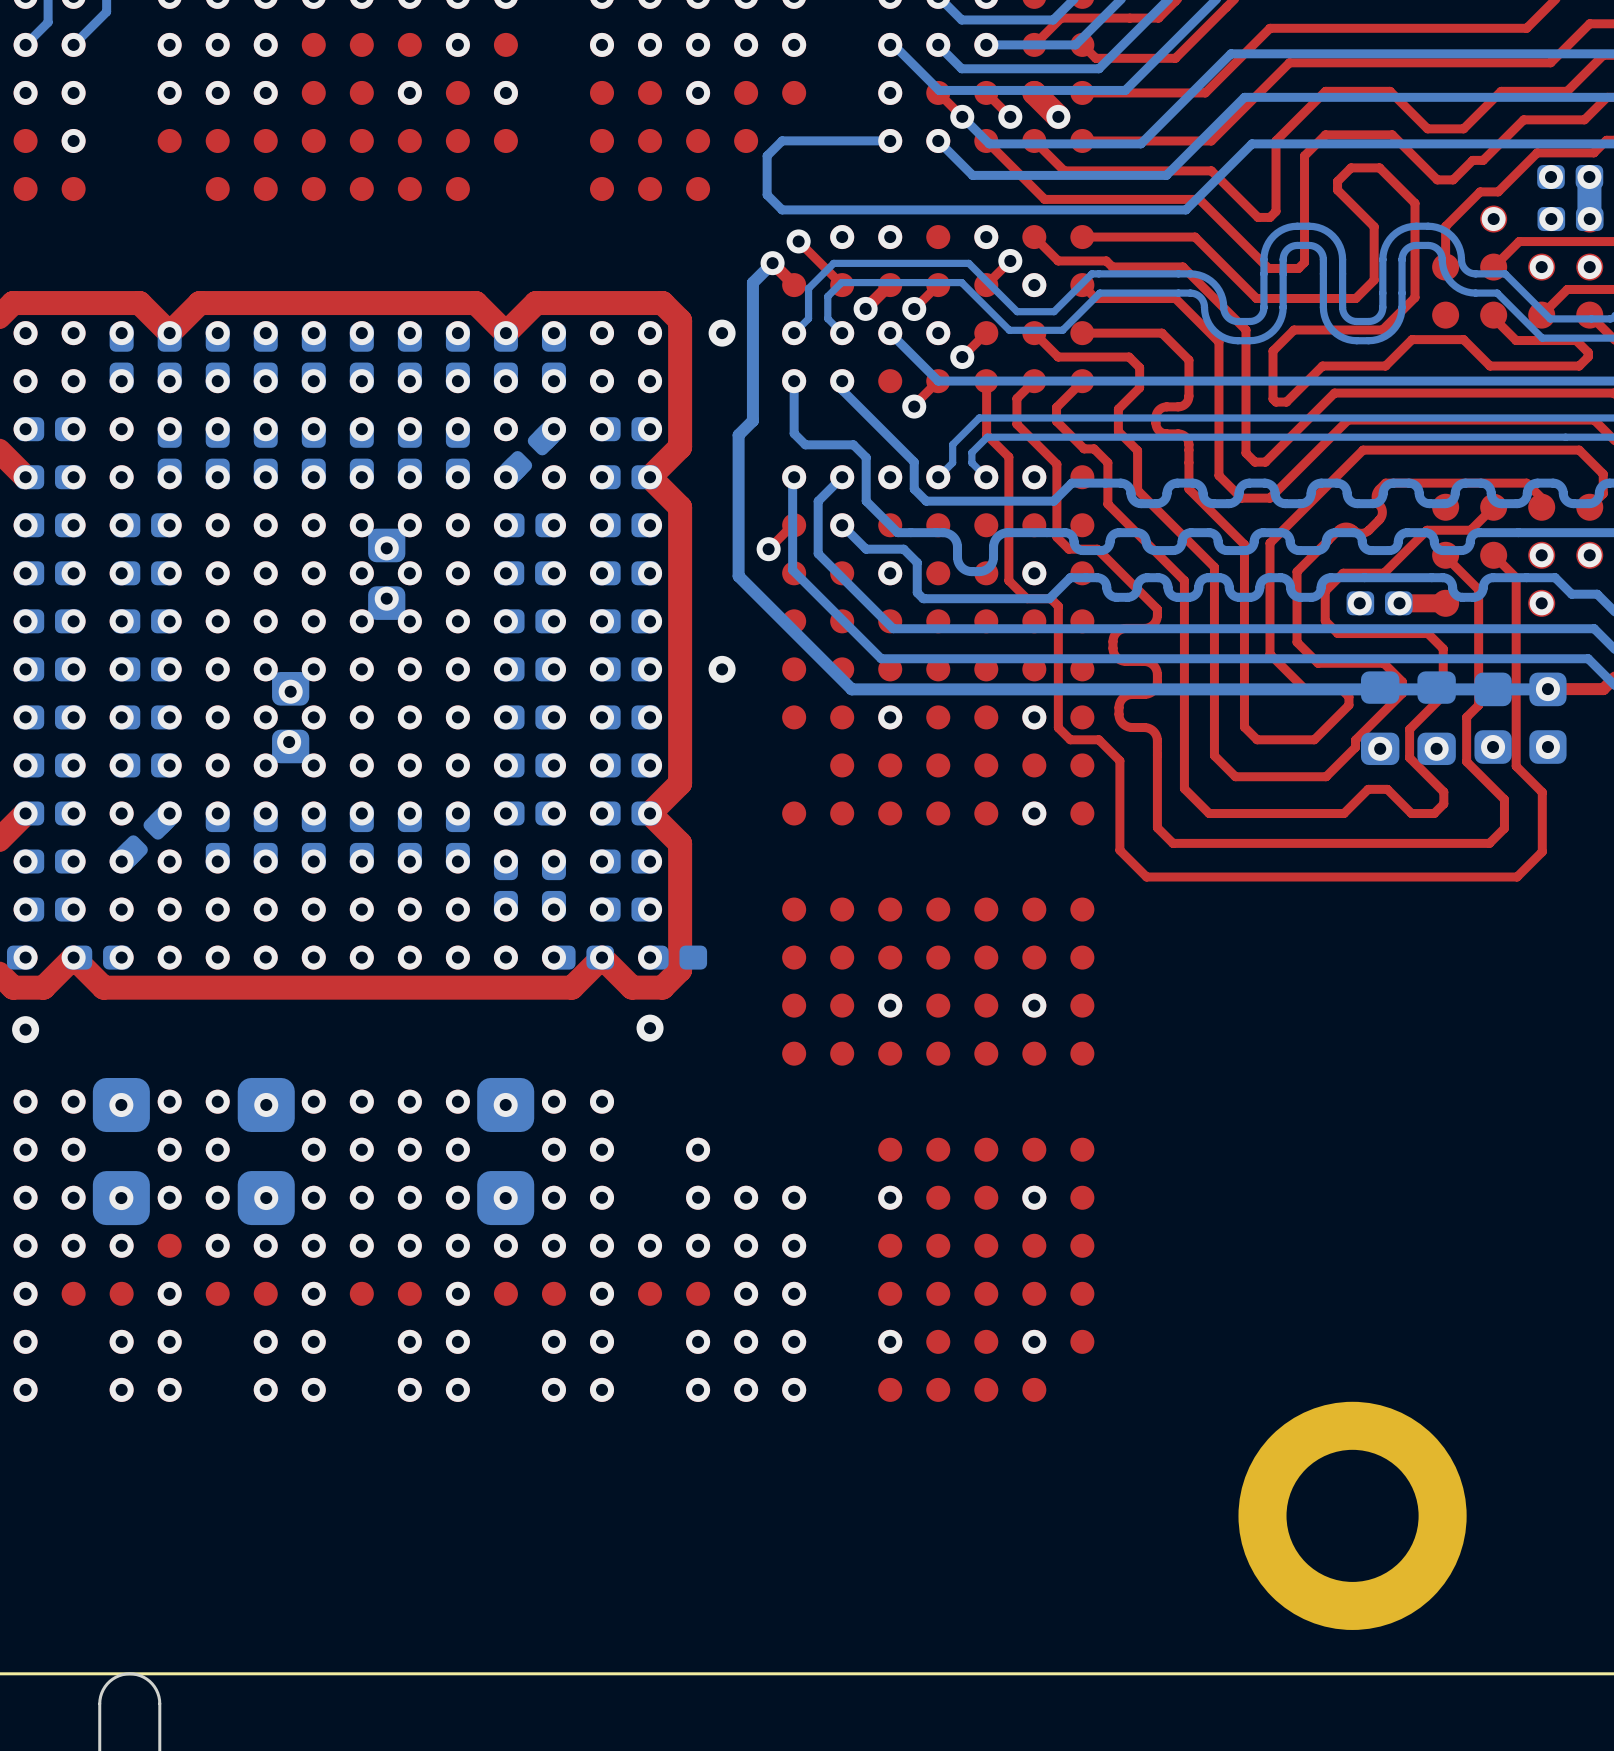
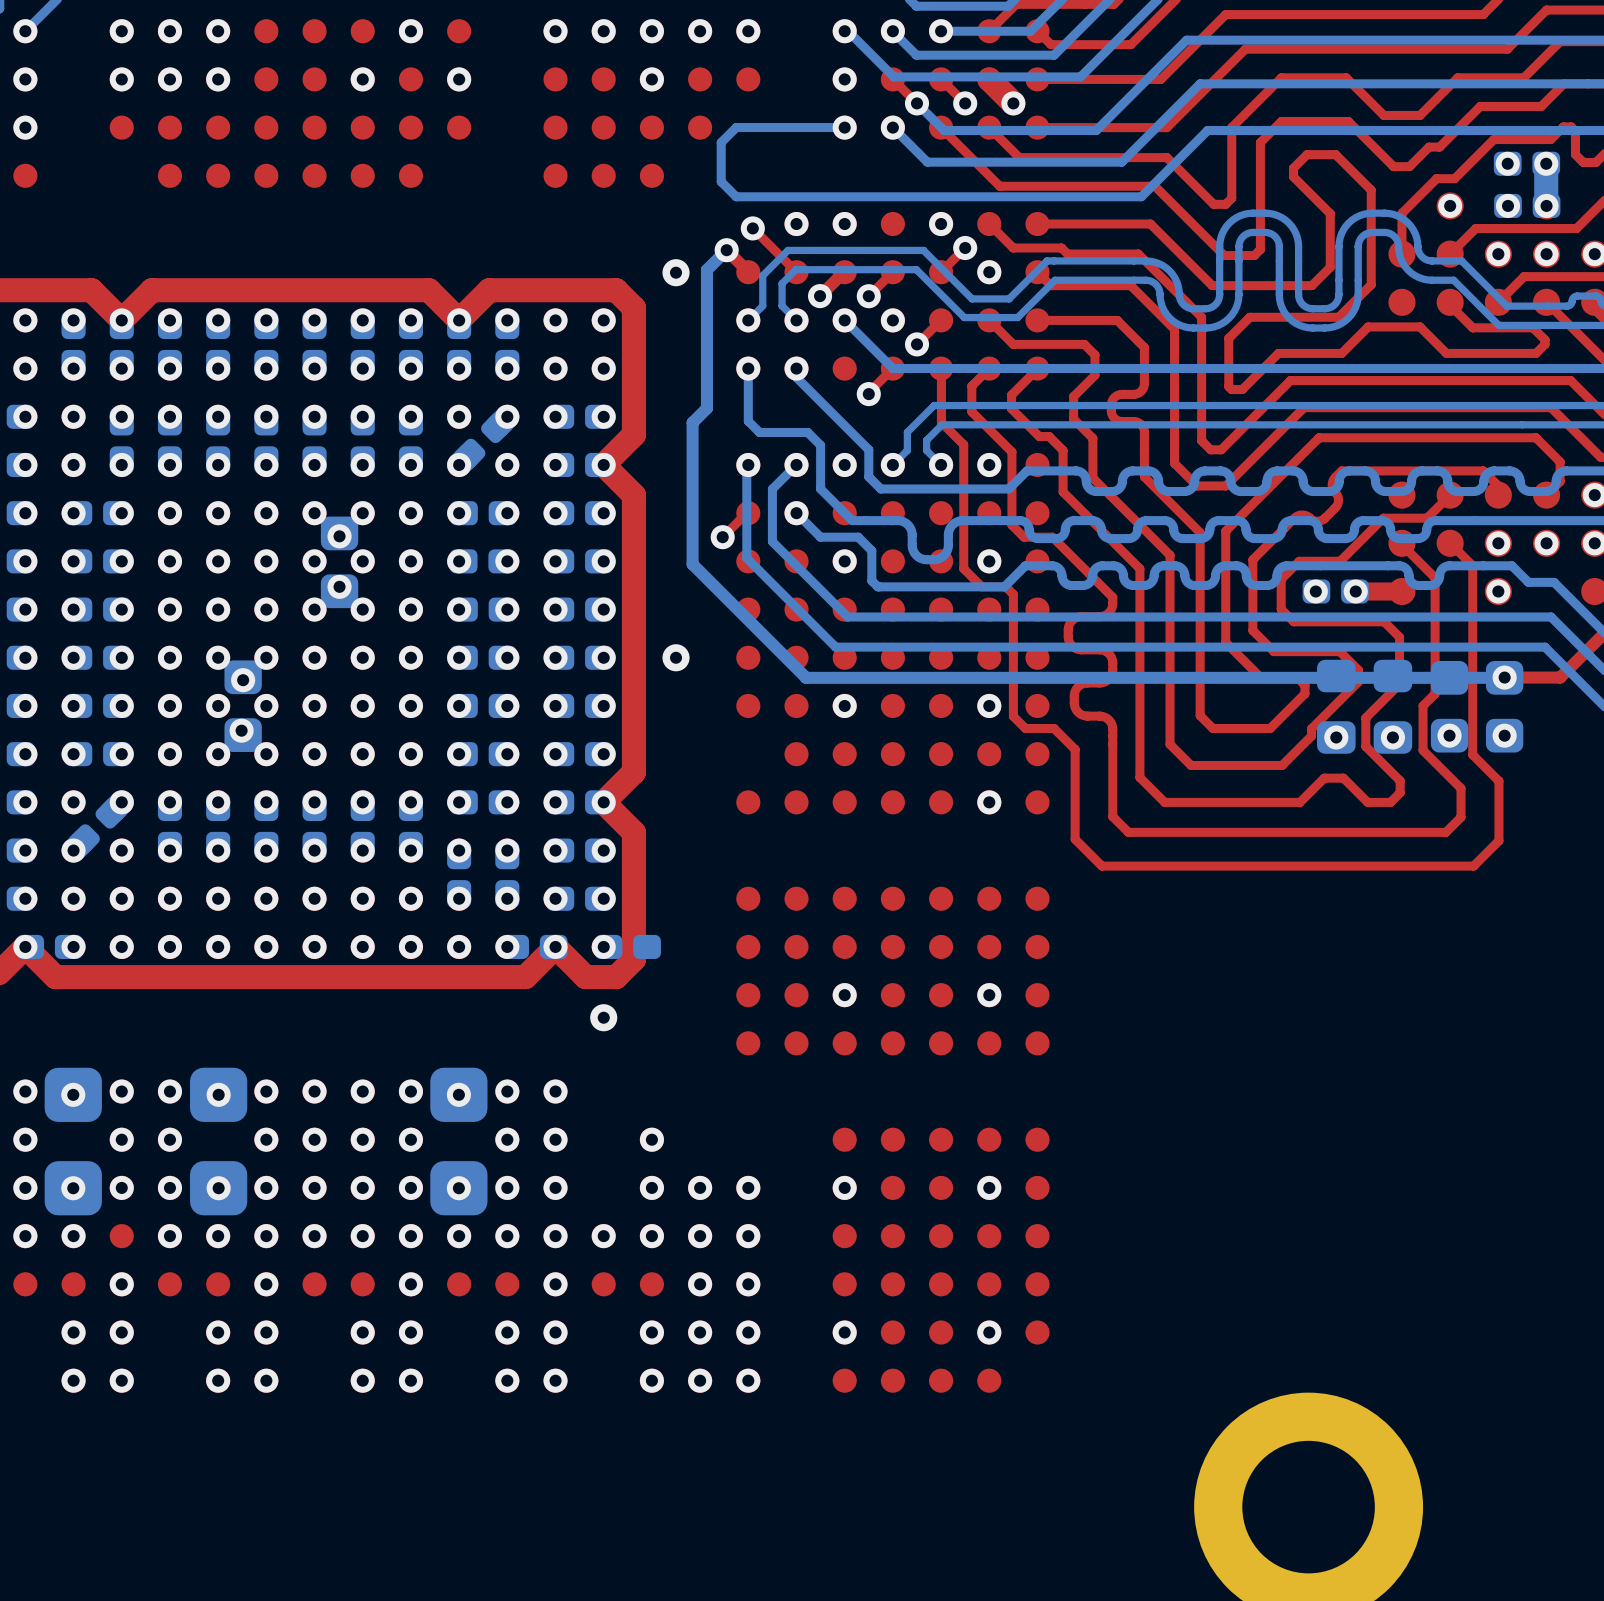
via position: (722, 333) -> (676, 272)

